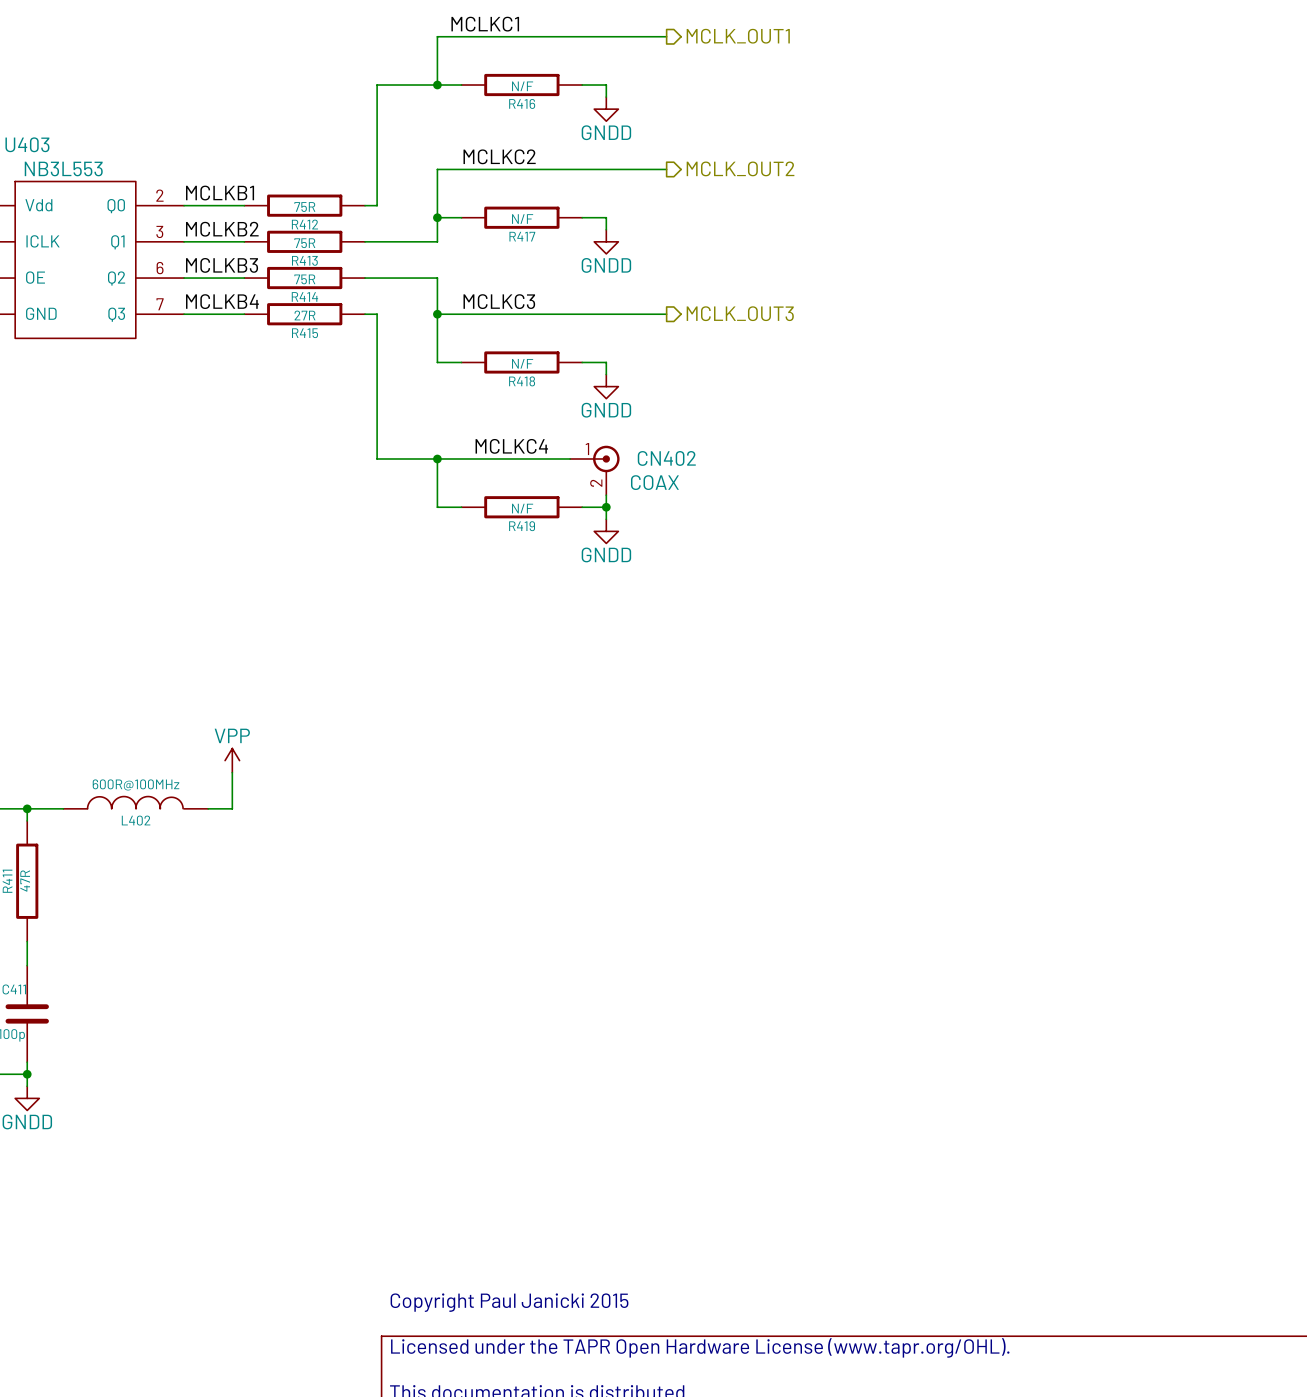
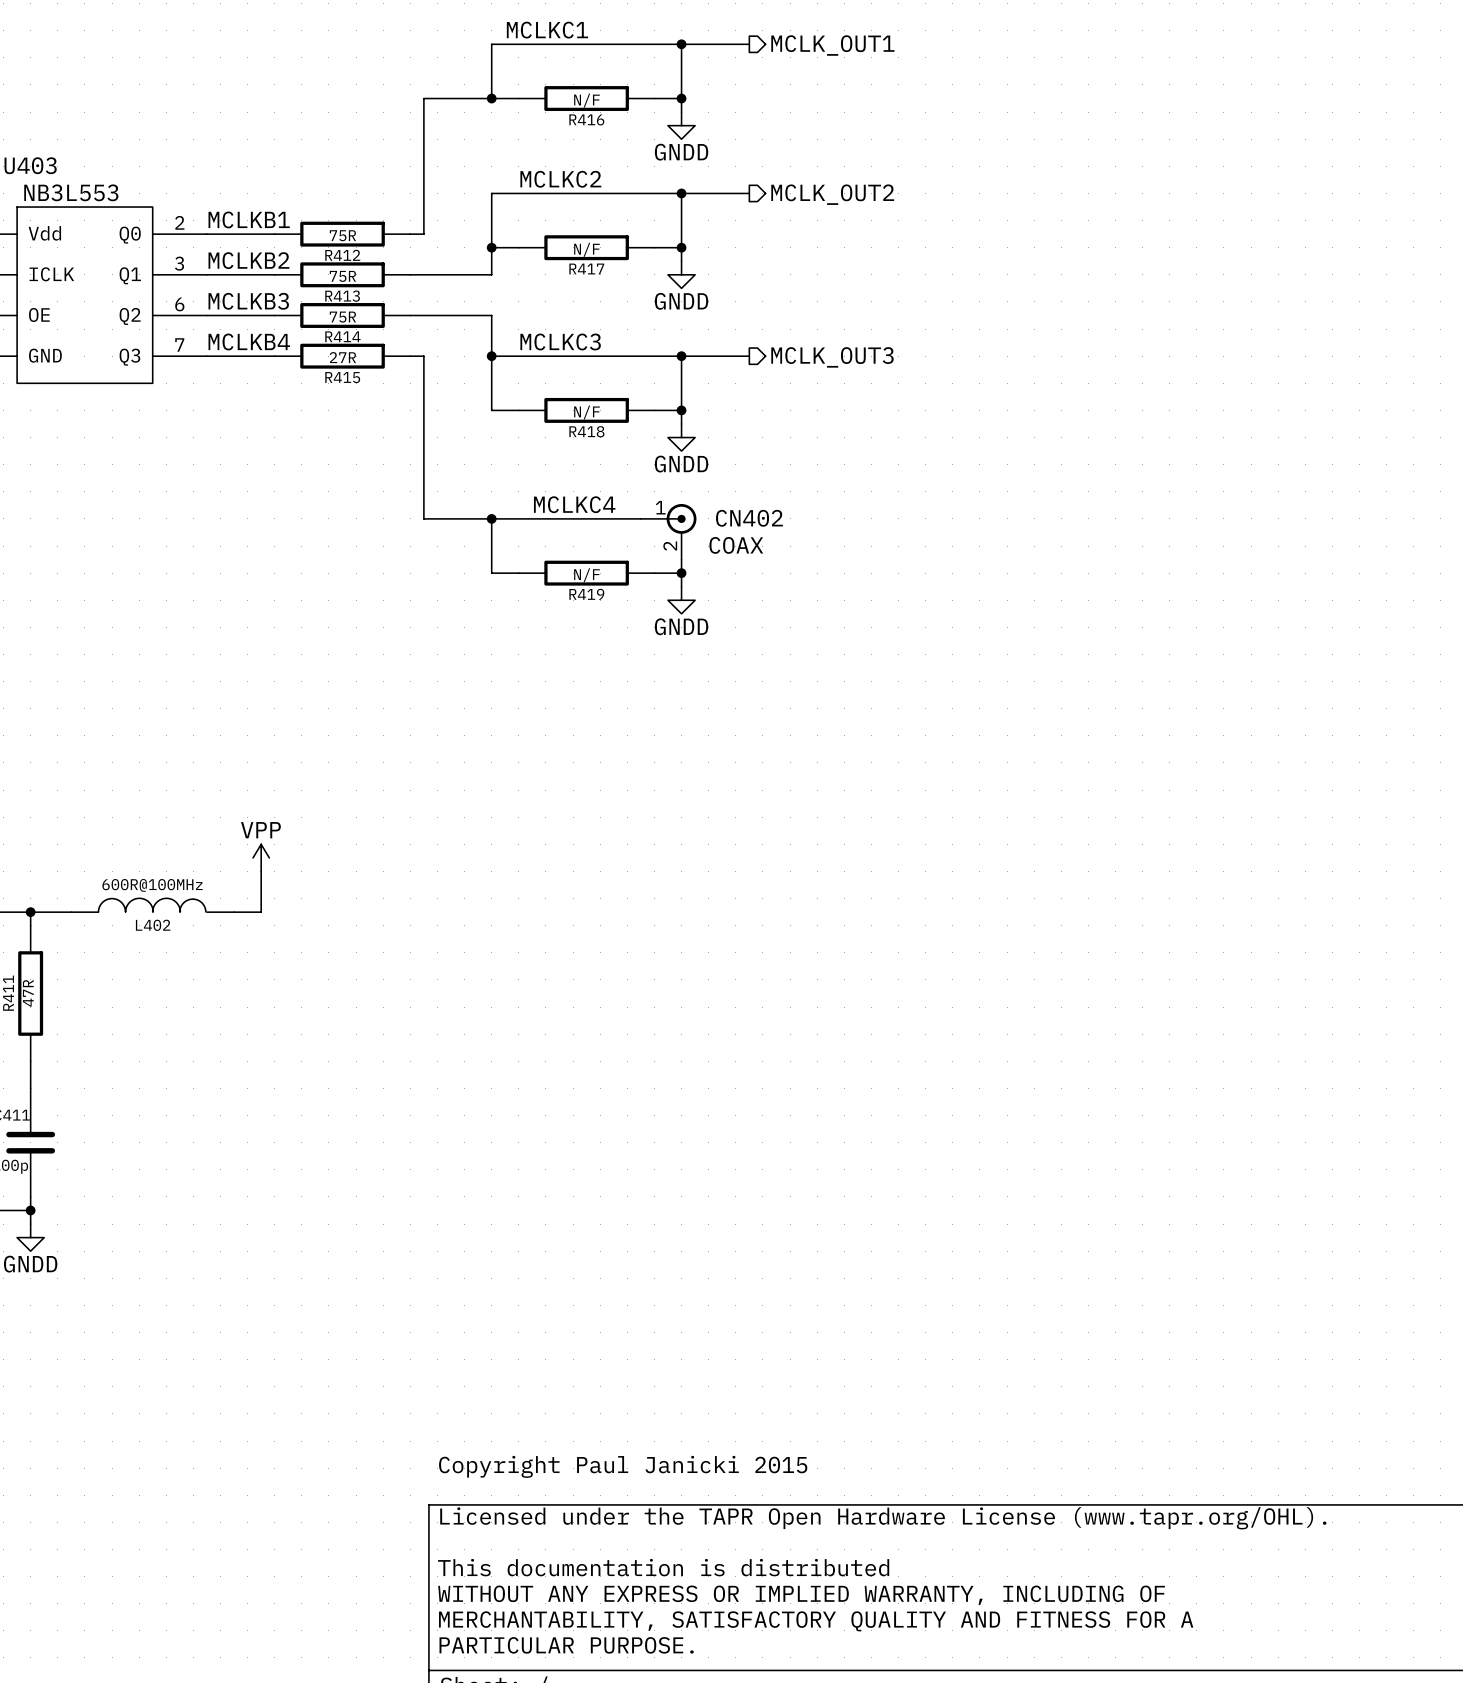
wire: none -> (681, 44) (681, 98)
junction: none -> (681, 44)
junction: none -> (681, 98)
wire: none -> (681, 193) (681, 247)
junction: none -> (681, 193)
junction: none -> (681, 247)
wire: none -> (681, 356) (681, 410)
junction: none -> (681, 356)
junction: none -> (681, 410)

